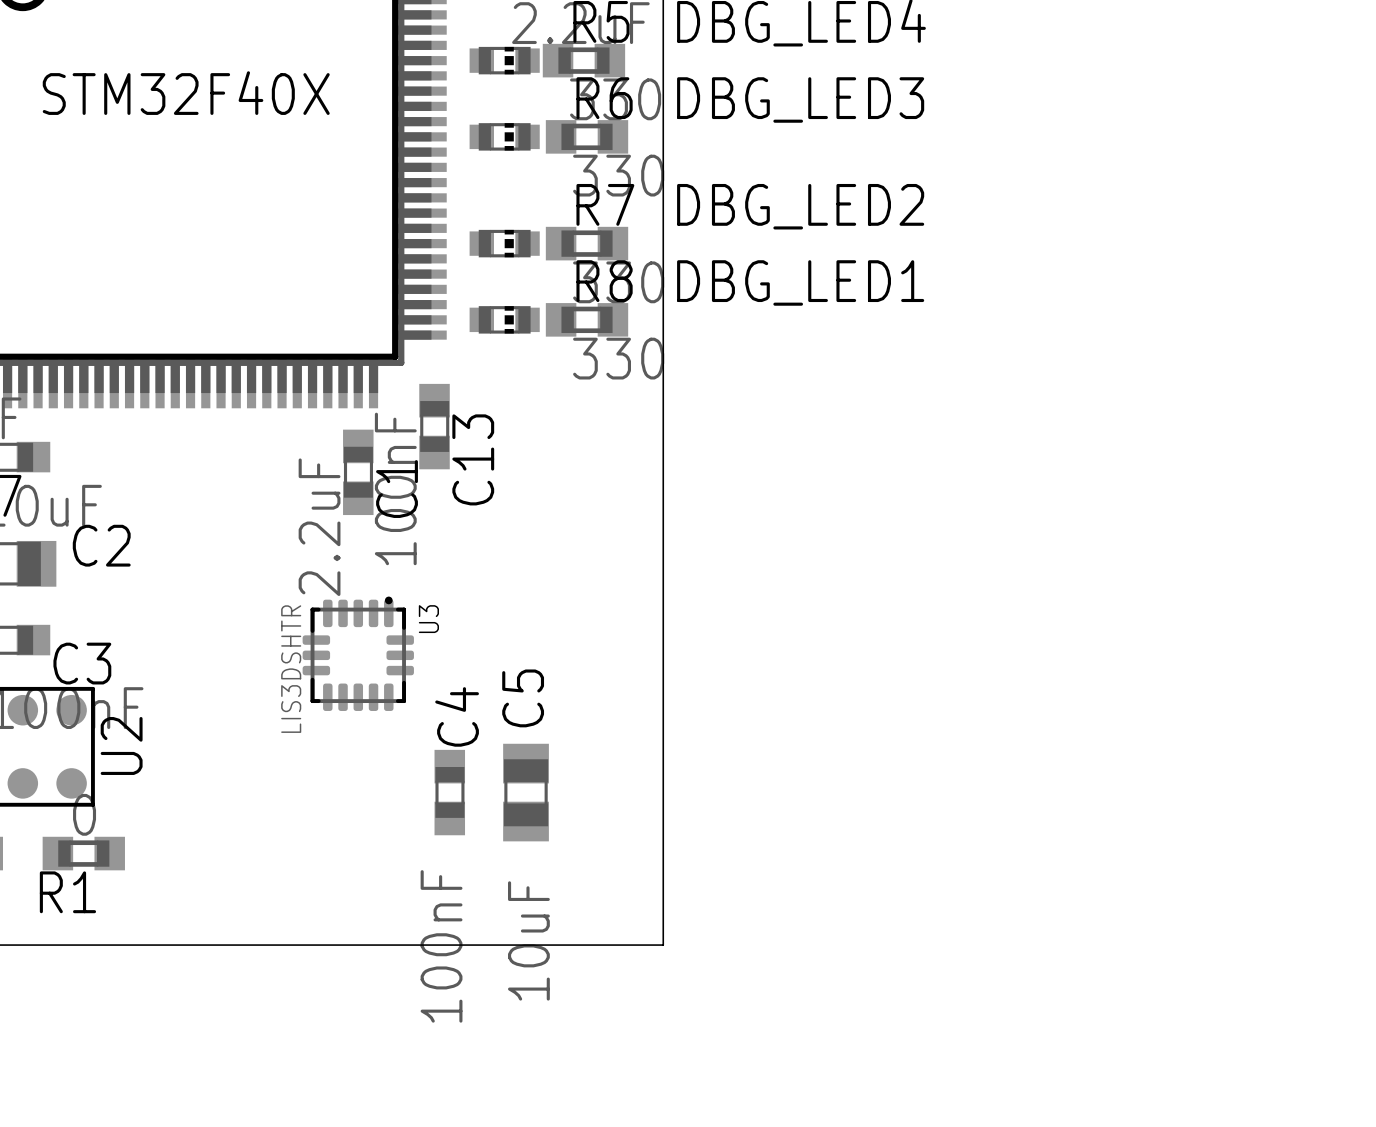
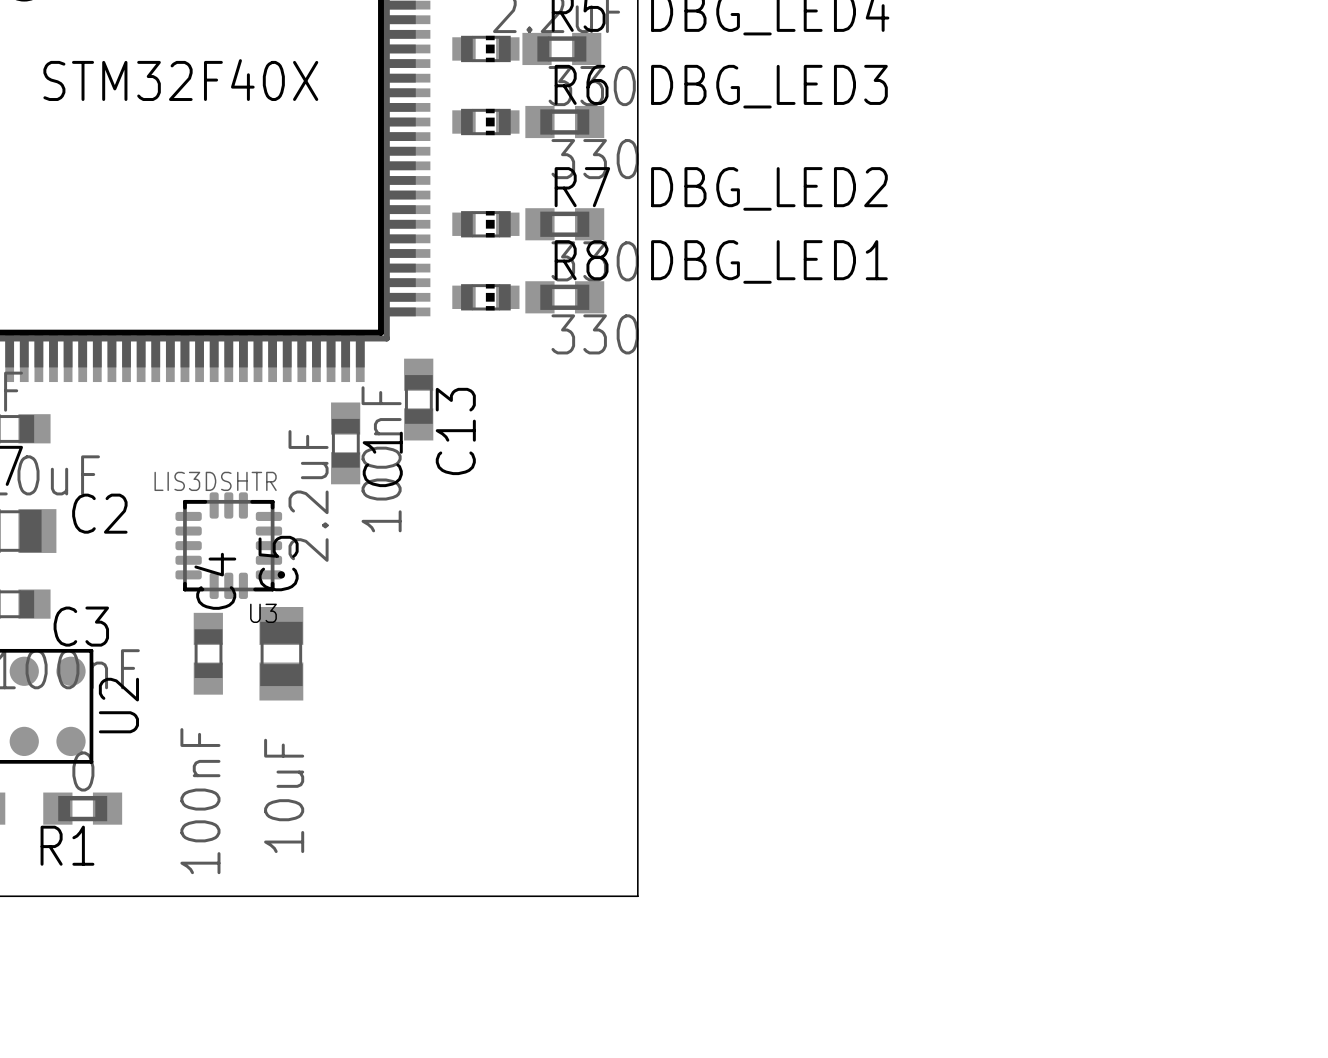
U3 rotation: 0° (358, 653) -> 90° clockwise (230, 545)
U3 position: (358, 653) -> (230, 545)
C4 position: (449, 792) -> (208, 653)
C5 position: (526, 792) -> (281, 653)

